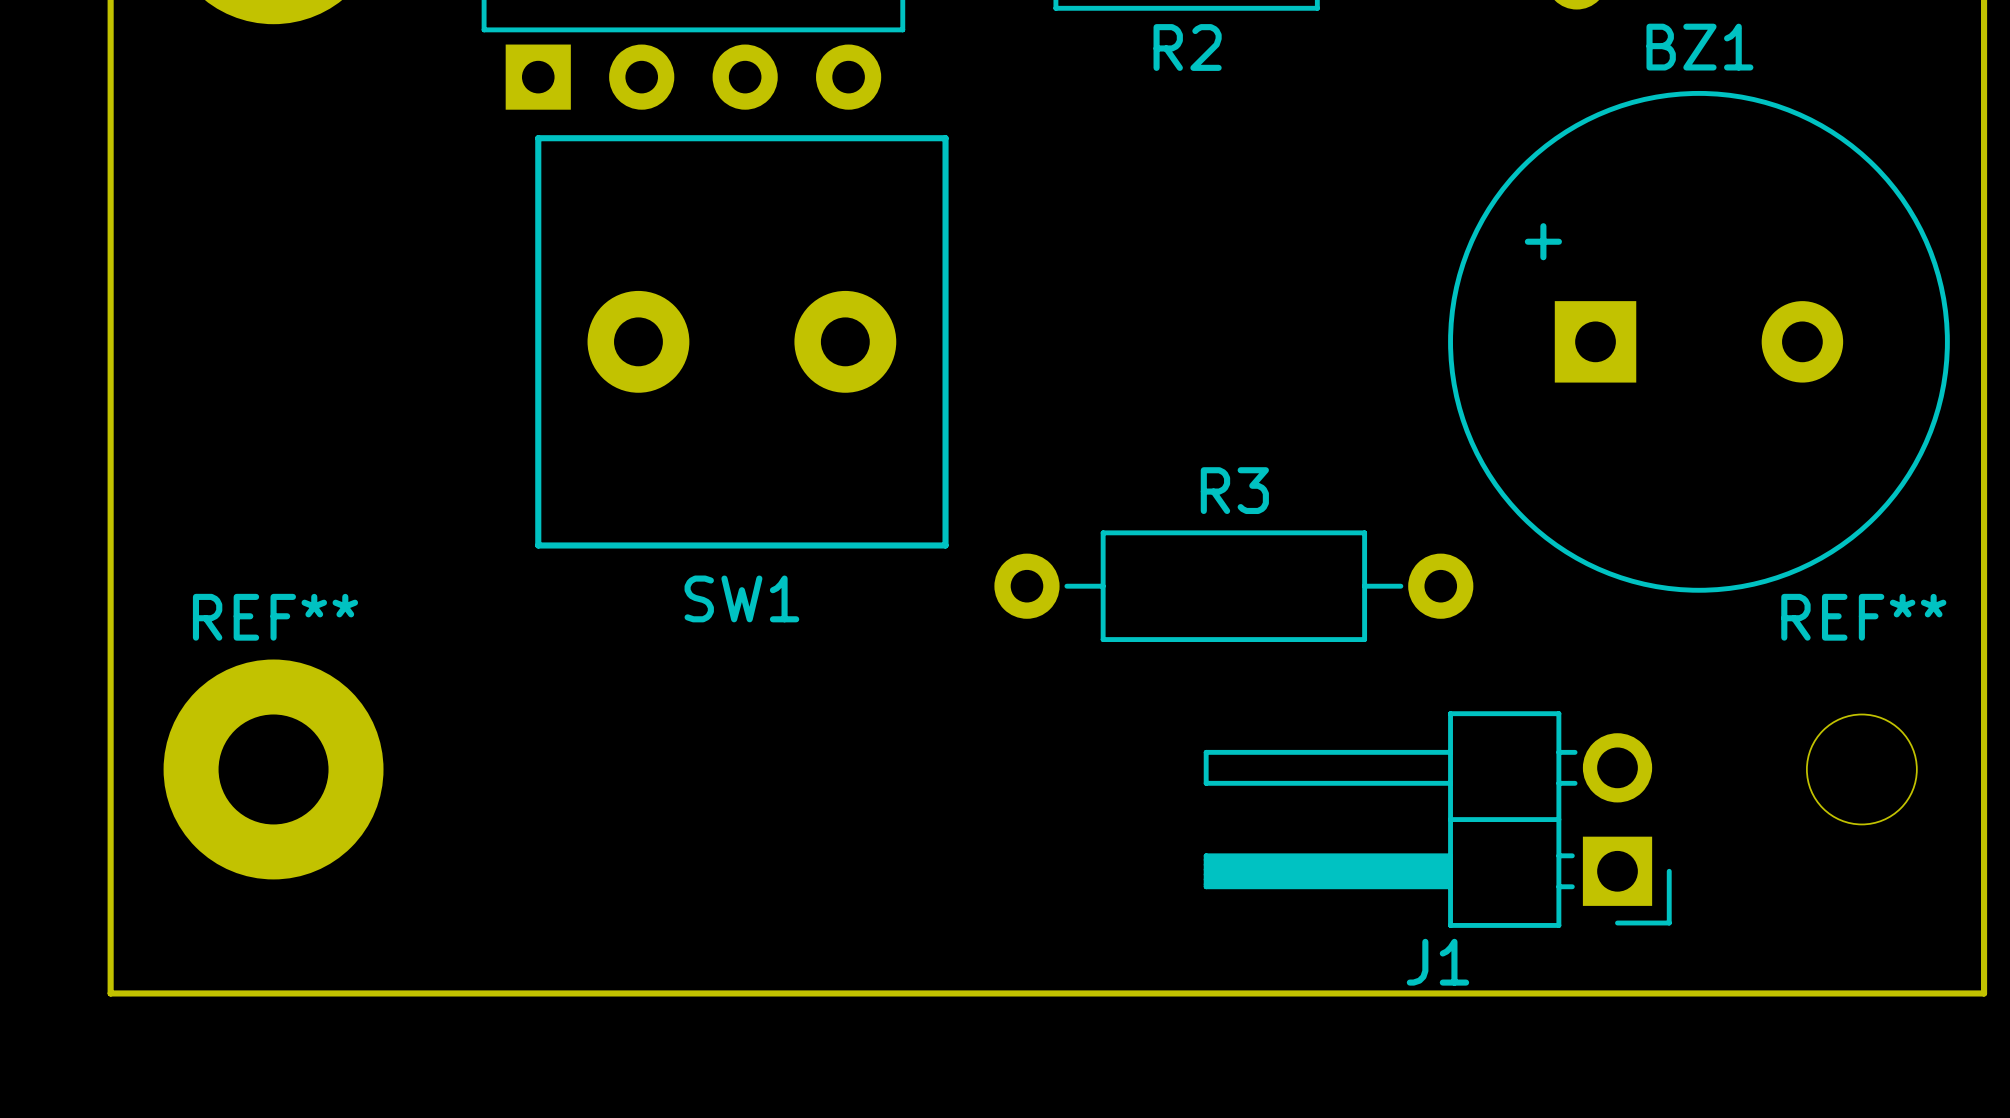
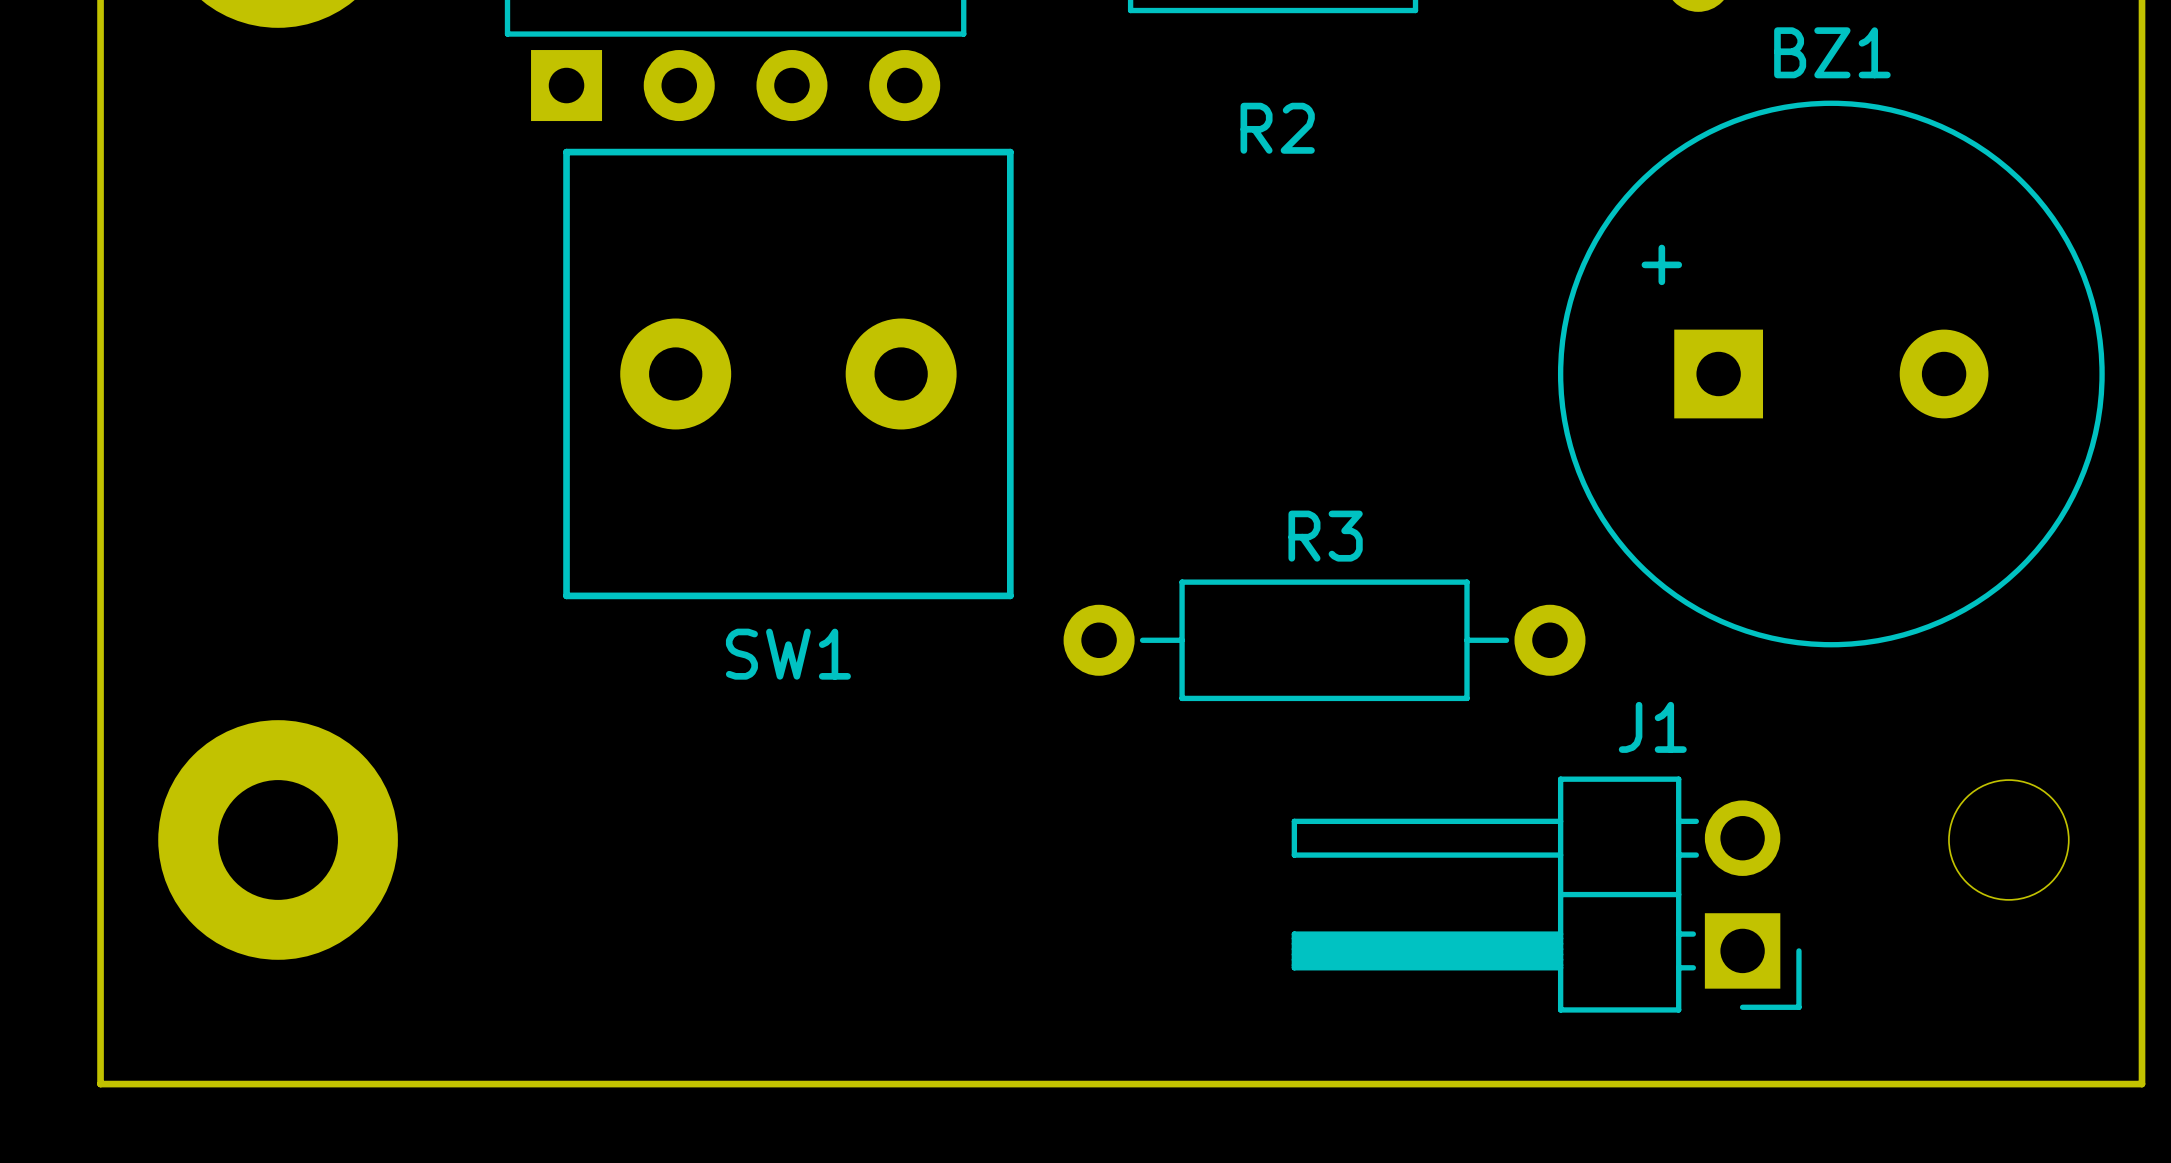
R2 name position: R2 (1187, 47) -> R2 (1277, 128)
REF** name: REF** (275, 617) -> none
REF** name: REF** (1863, 617) -> none
J1 name position: J1 (1437, 962) -> J1 (1652, 727)

